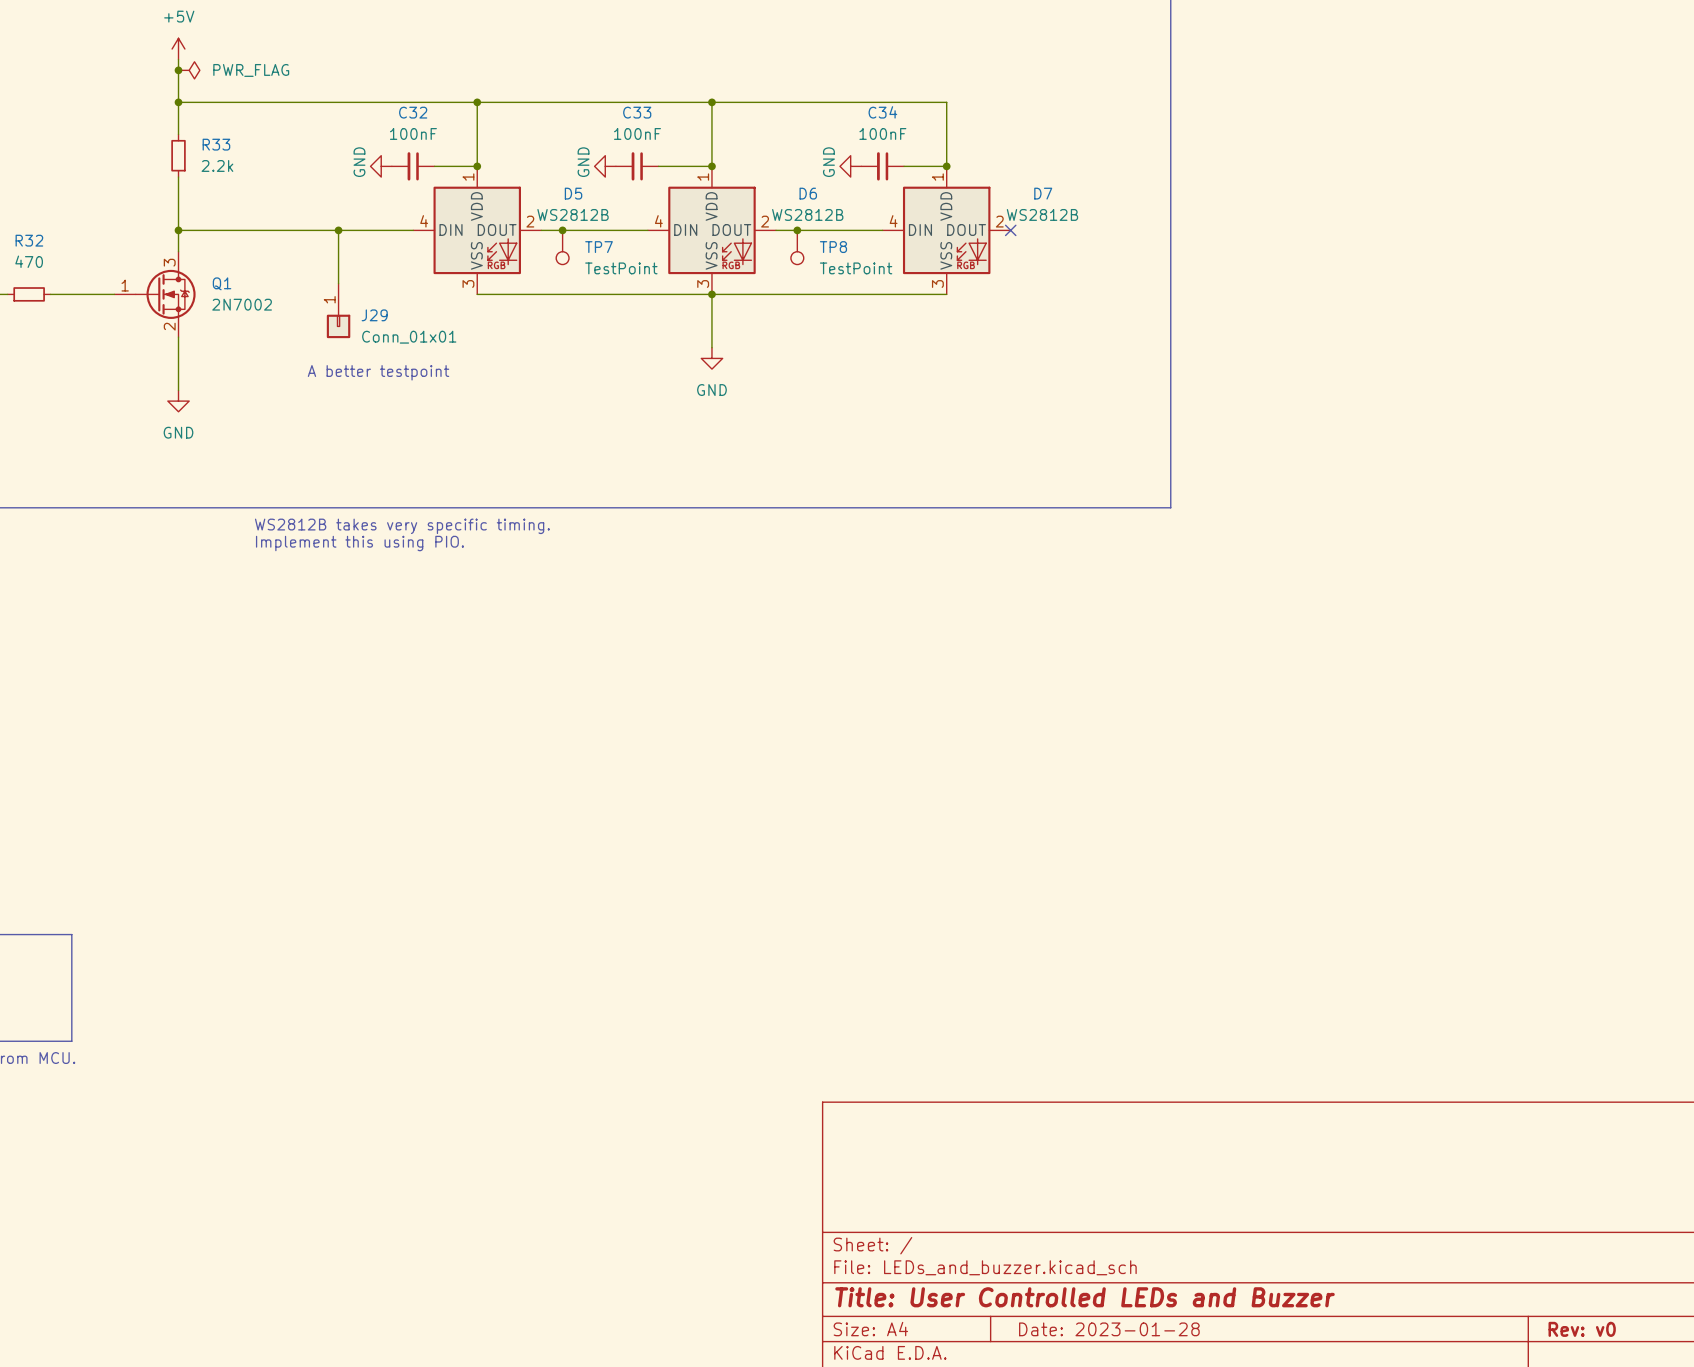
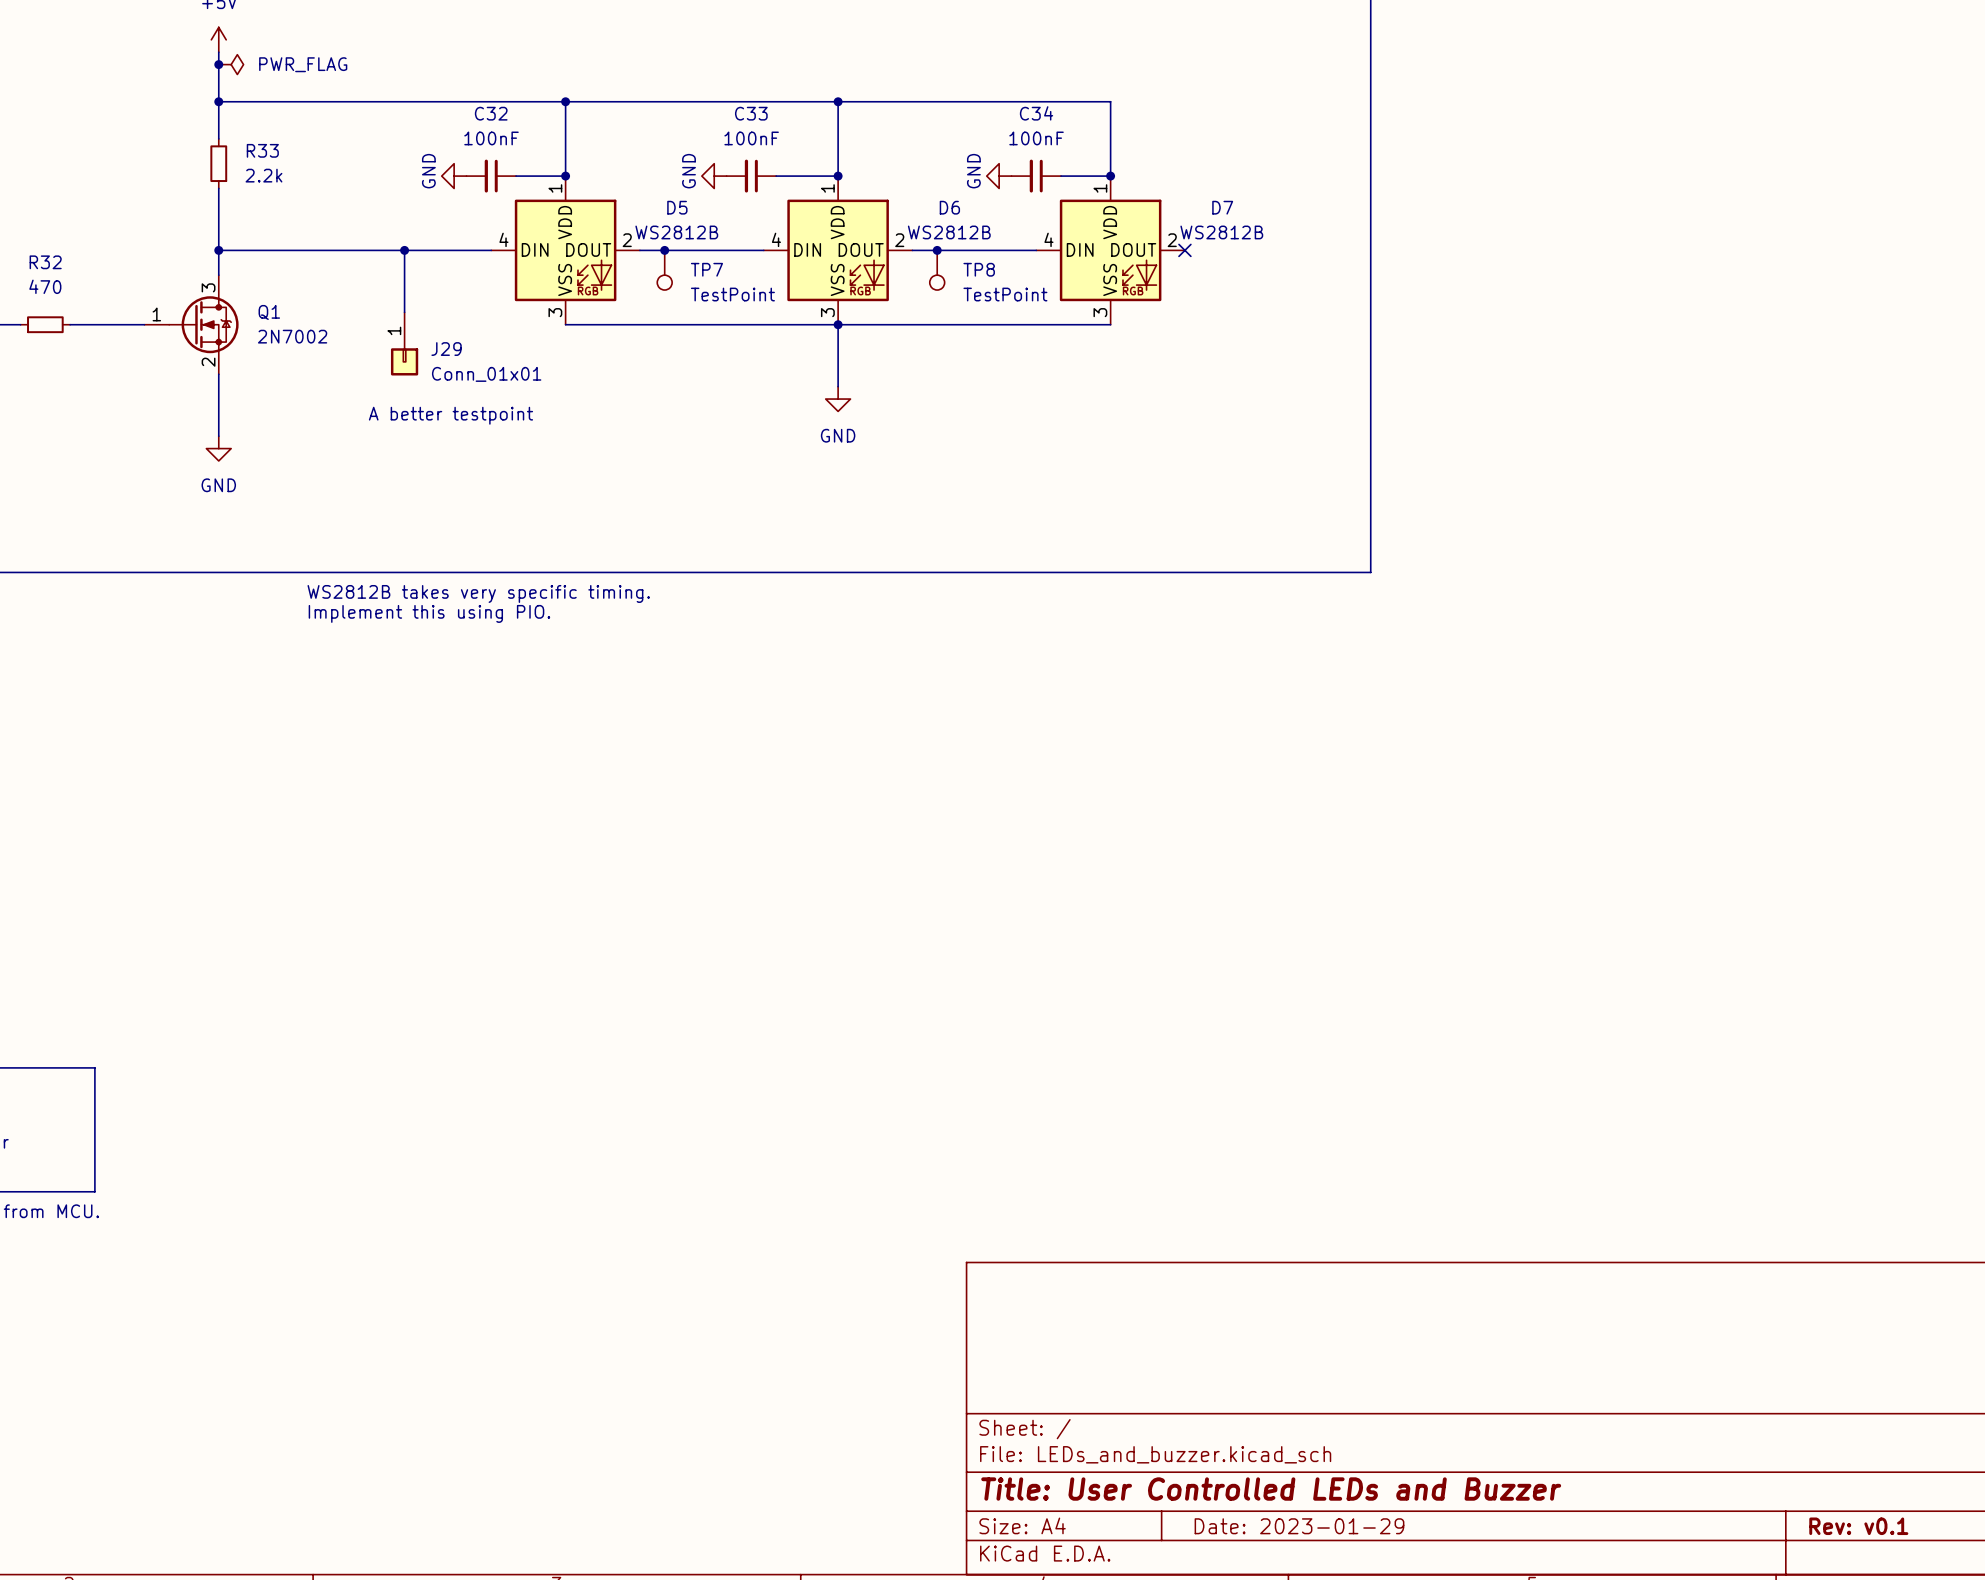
title block: Date: 2023-01-28 (1109, 1329) -> Date: 2023-01-29 (1299, 1526)
title block: Rev: v0 (1582, 1329) -> Rev: v0.1 (1858, 1526)

